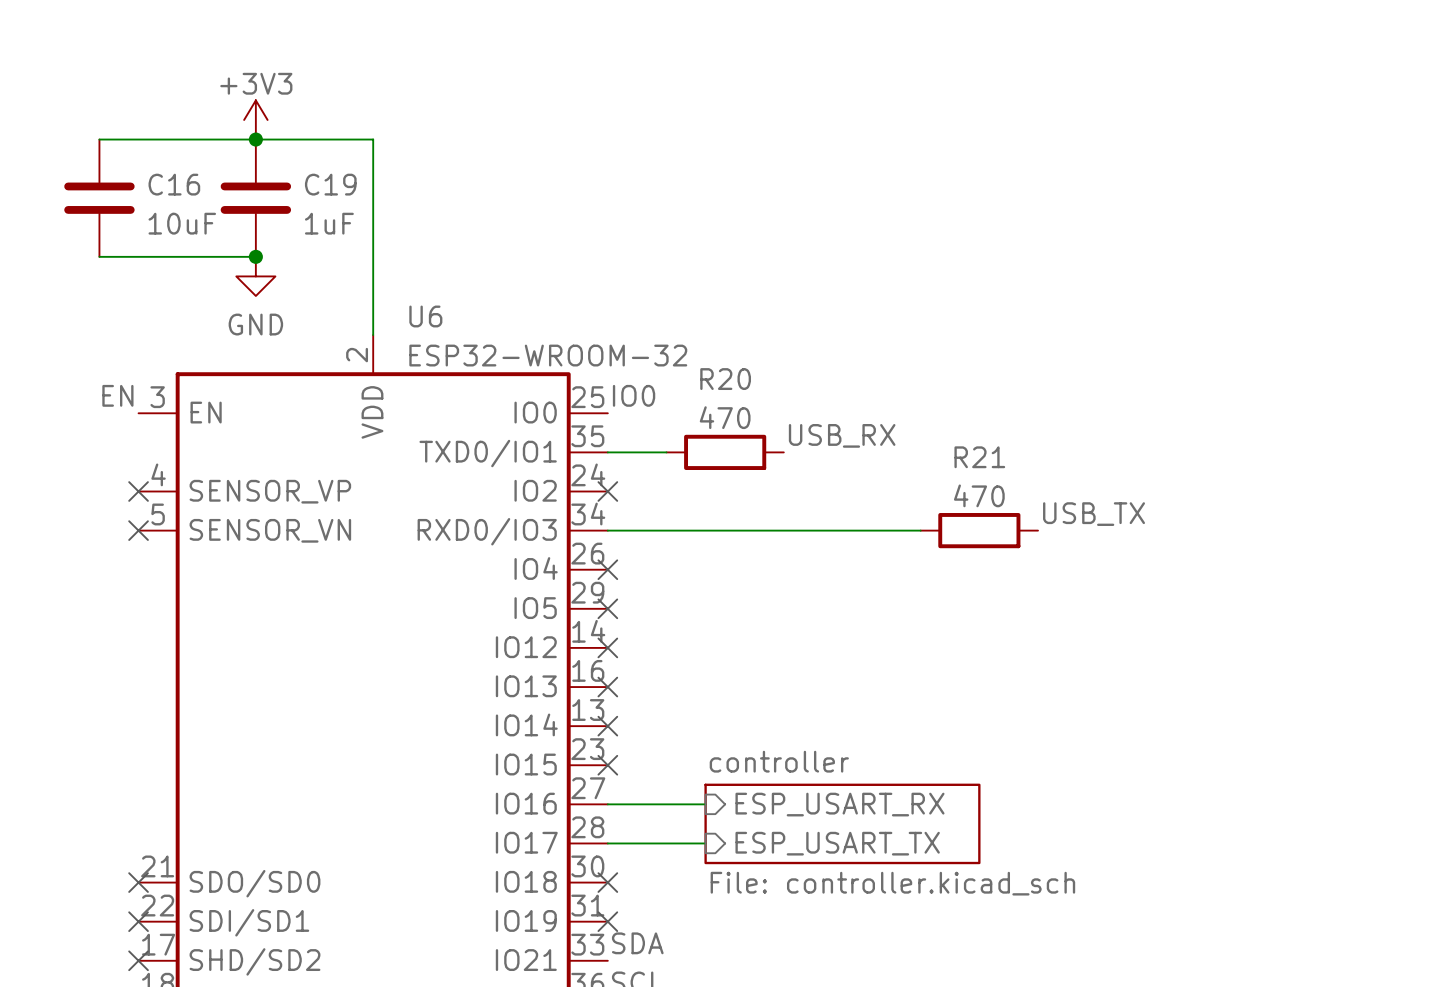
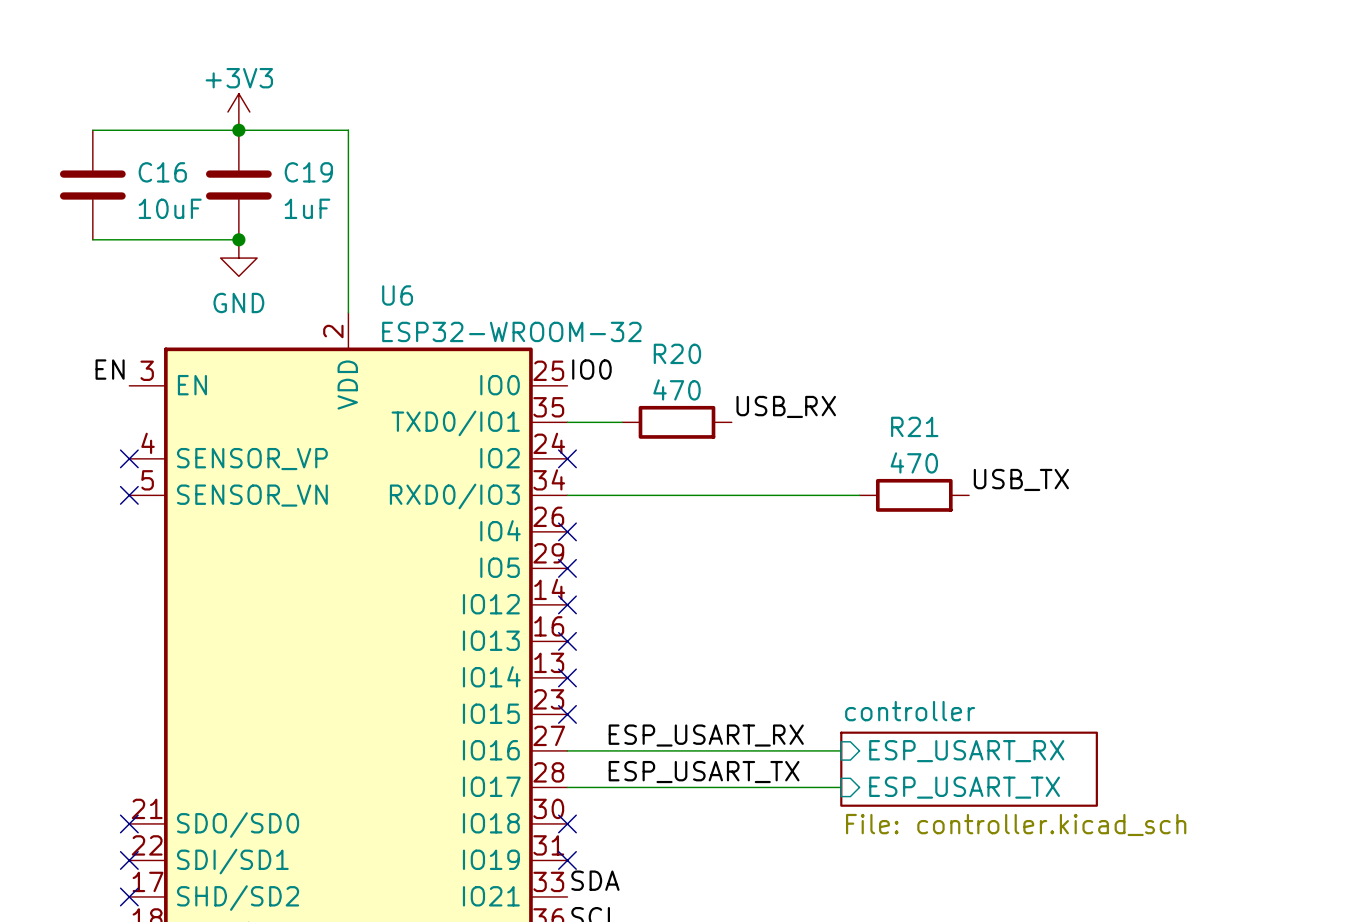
label: none -> ESP_USART_RX (706, 735)
wire: none -> (658, 750) (841, 750)
sheet pin position: ESP_USART_RX (839, 804) -> ESP_USART_RX (966, 751)
sheet controller position: (842, 823) -> (969, 769)
label: none -> ESP_USART_TX (704, 772)
wire: none -> (658, 787) (841, 787)
sheet pin position: ESP_USART_TX (837, 843) -> ESP_USART_TX (964, 787)

